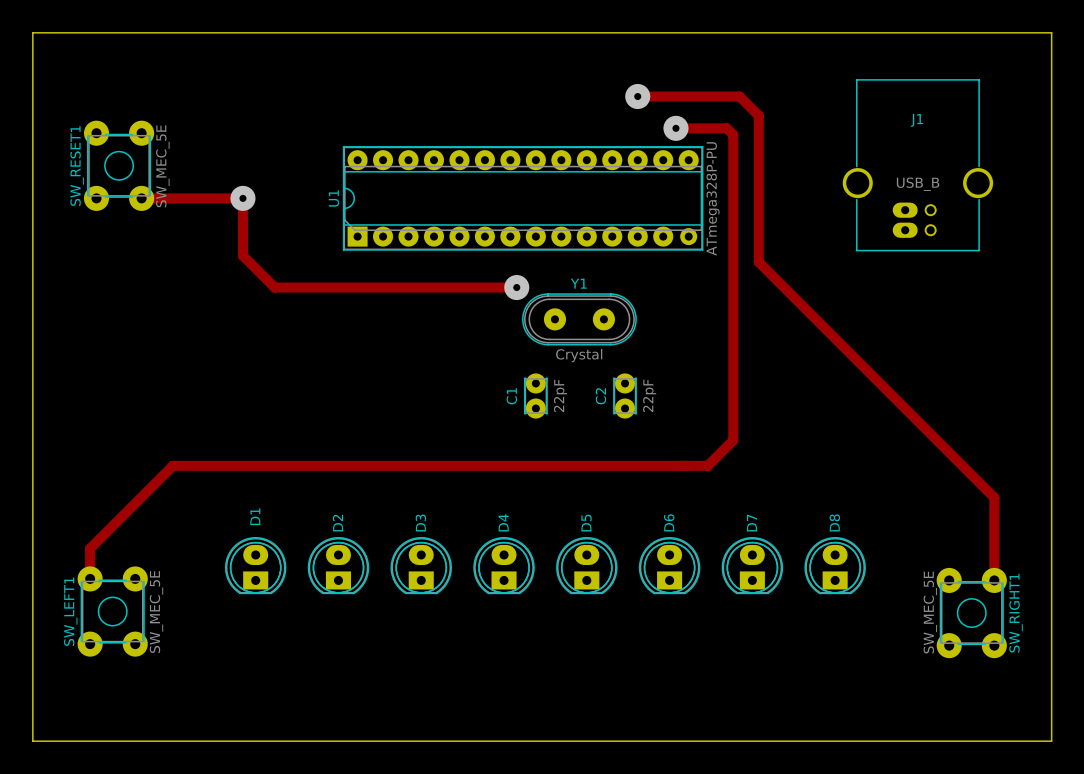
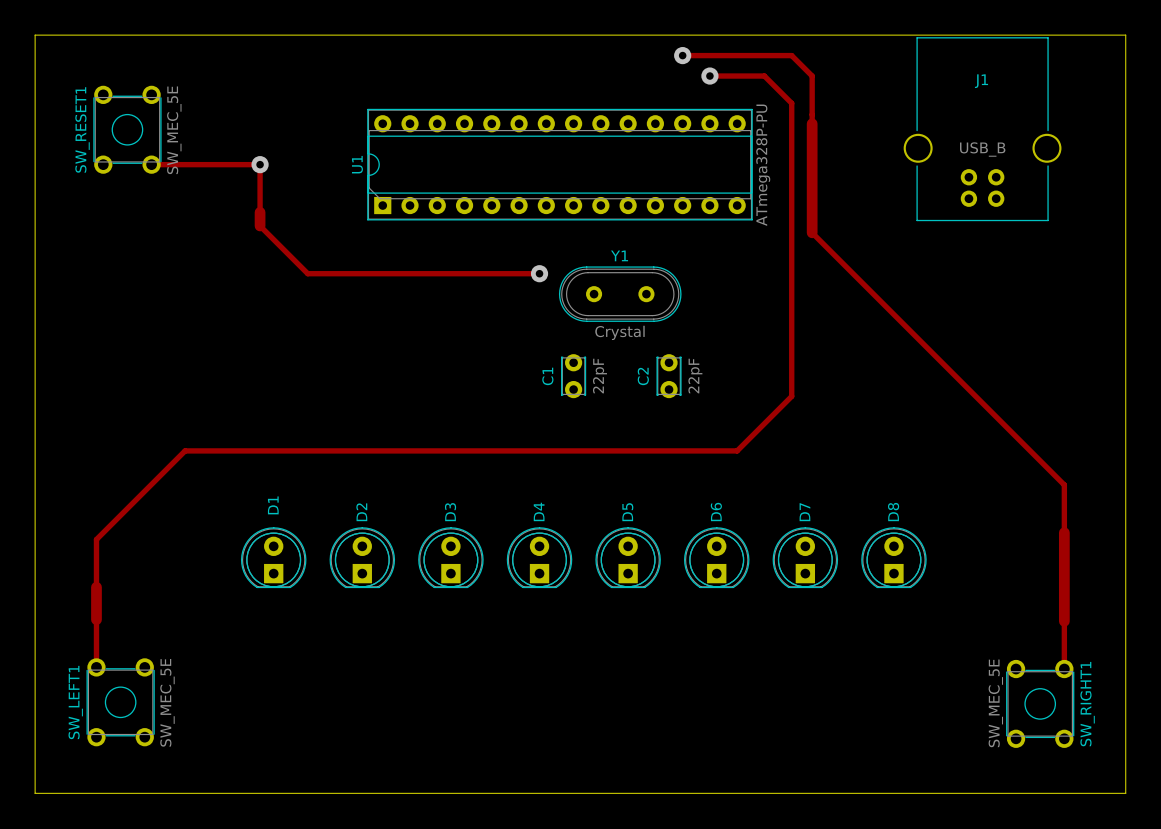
via: none -> (682, 55)
via: none -> (709, 76)
J1 footprint: [842, 79, 994, 252] -> [903, 37, 1062, 222]
track: (637, 96) (739, 96) (758, 115) -> (682, 55) (791, 55) (812, 76) (812, 123)
via: (637, 96) -> none
SW_RESET1 footprint: [83, 120, 155, 211] -> [93, 85, 162, 174]
track: (675, 128) (726, 128) (733, 134) (733, 440) (707, 465) (172, 465) (90, 548) -> (709, 76) (764, 76) (791, 103) (791, 396) (737, 450) (185, 450) (96, 539) (96, 587)
via: (675, 128) -> none
U1 footprint: [343, 146, 704, 251] -> [367, 108, 753, 221]
via: none -> (260, 164)
track: (141, 198) (242, 198) -> (151, 164) (260, 164) (260, 212)
via: (242, 198) -> none
track: (242, 211) (242, 255) (274, 287) (516, 287) -> (260, 225) (307, 273) (539, 273)
track: (758, 217) (758, 262) (994, 497) -> (812, 232) (1064, 485) (1064, 532)
via: none -> (539, 273)
via: (516, 287) -> none
Y1 footprint: [522, 293, 637, 346] -> [558, 266, 682, 322]
C1 footprint: [524, 373, 548, 419] -> [561, 354, 587, 399]
C2 footprint: [613, 373, 637, 419] -> [656, 354, 682, 399]
D1 footprint: [225, 537, 287, 594] -> [240, 527, 307, 589]
D2 footprint: [307, 537, 370, 594] -> [329, 527, 396, 589]
D3 footprint: [390, 537, 452, 594] -> [418, 527, 484, 589]
D4 footprint: [473, 537, 535, 594] -> [506, 527, 573, 589]
D5 footprint: [556, 537, 618, 594] -> [595, 527, 661, 589]
D6 footprint: [639, 537, 701, 594] -> [684, 527, 750, 589]
D7 footprint: [721, 537, 783, 594] -> [772, 527, 839, 589]
D8 footprint: [804, 537, 866, 594] -> [861, 527, 927, 589]
SW_LEFT1 footprint: [77, 566, 148, 657] -> [86, 658, 155, 747]
SW_RIGHT1 footprint: [936, 567, 1007, 659] -> [1006, 659, 1075, 748]
track: none -> (96, 619) (96, 667)
track: none -> (1064, 621) (1064, 669)

